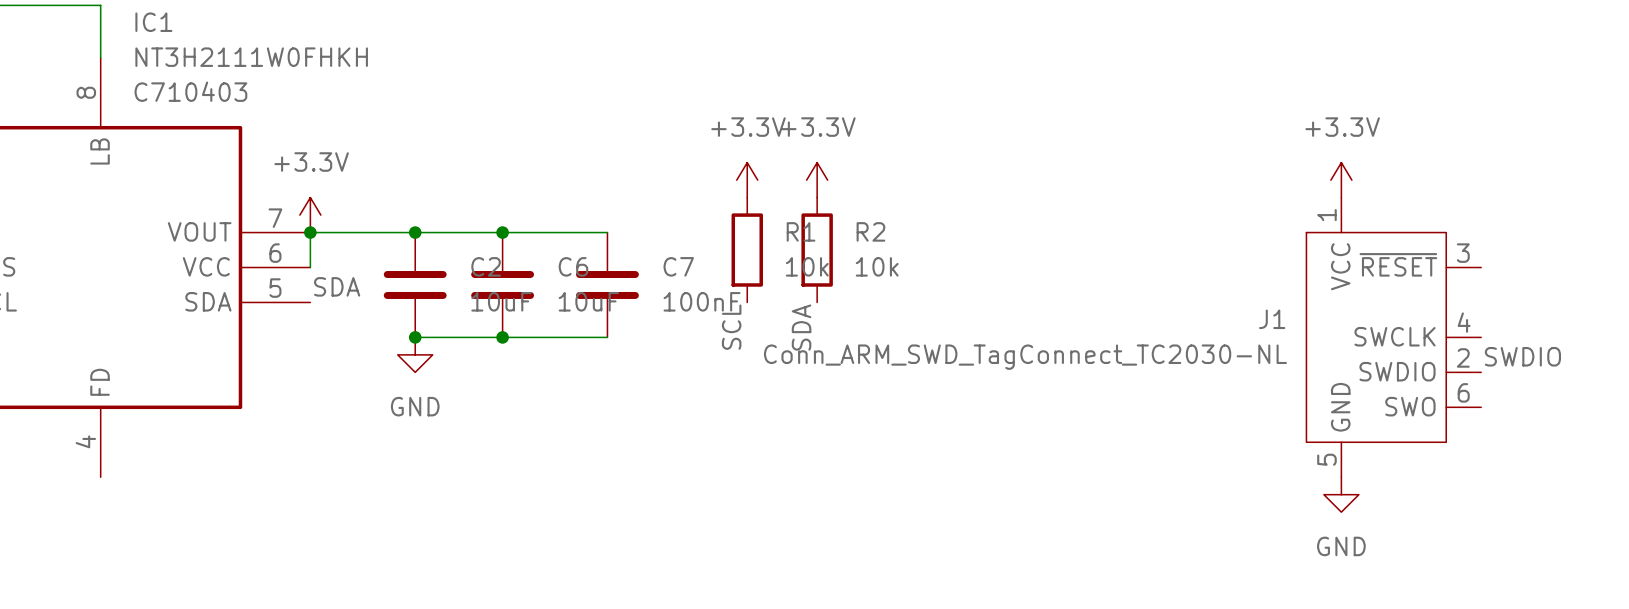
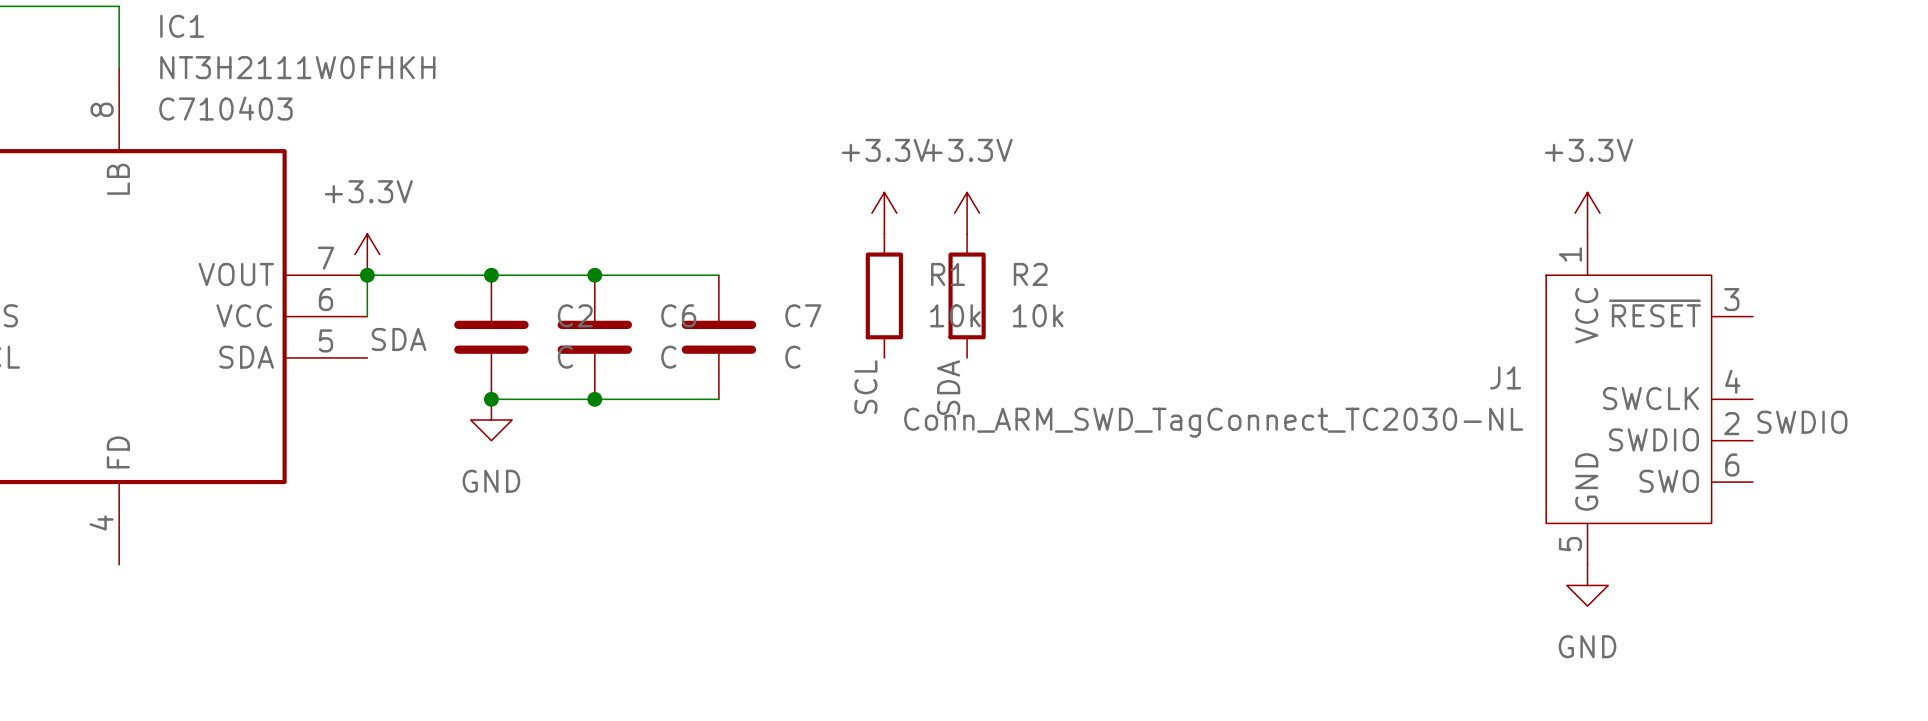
C2 value: 10uF (501, 301) -> C (565, 357)
C6 value: 10uF (588, 301) -> C (668, 357)
C7 value: 100nF (702, 301) -> C (792, 357)

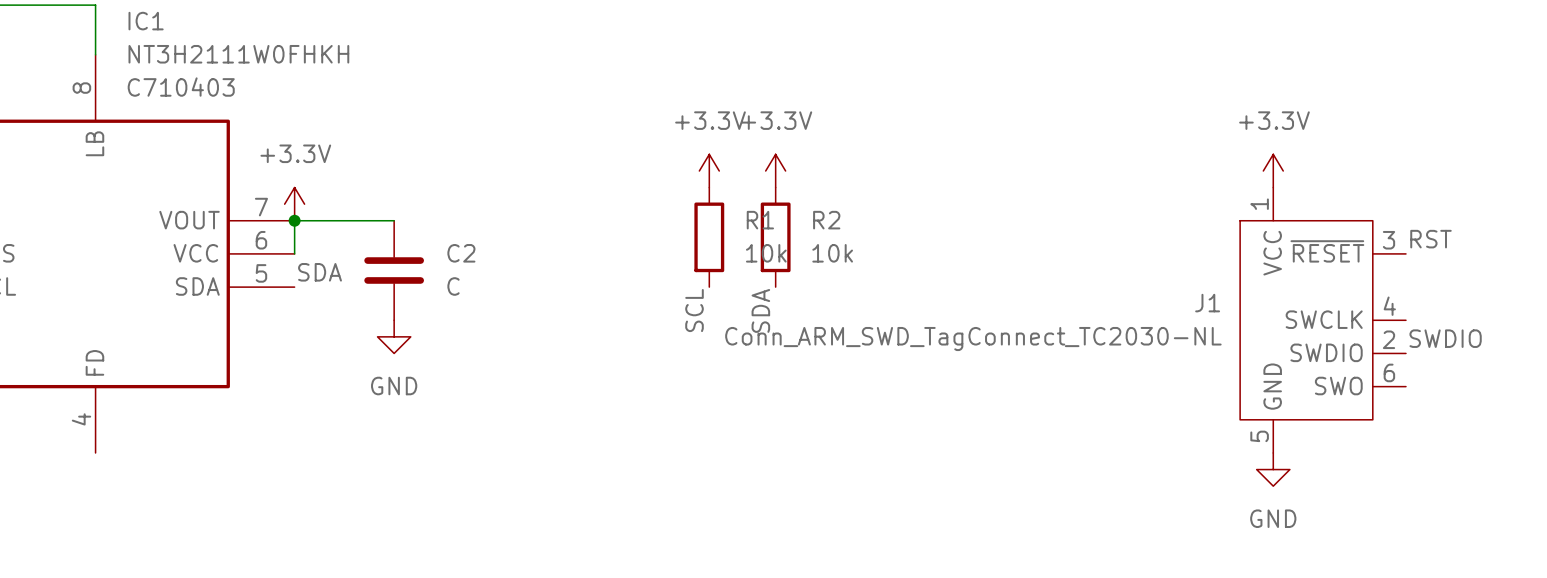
wire: (491, 275) (718, 275) -> none
junction: (491, 275) -> none
junction: (594, 275) -> none
label: none -> RST (1430, 239)
C6: C (594, 337) -> none
C7: C (718, 337) -> none
wire: (491, 399) (718, 399) -> none
junction: (491, 399) -> none
junction: (594, 399) -> none

